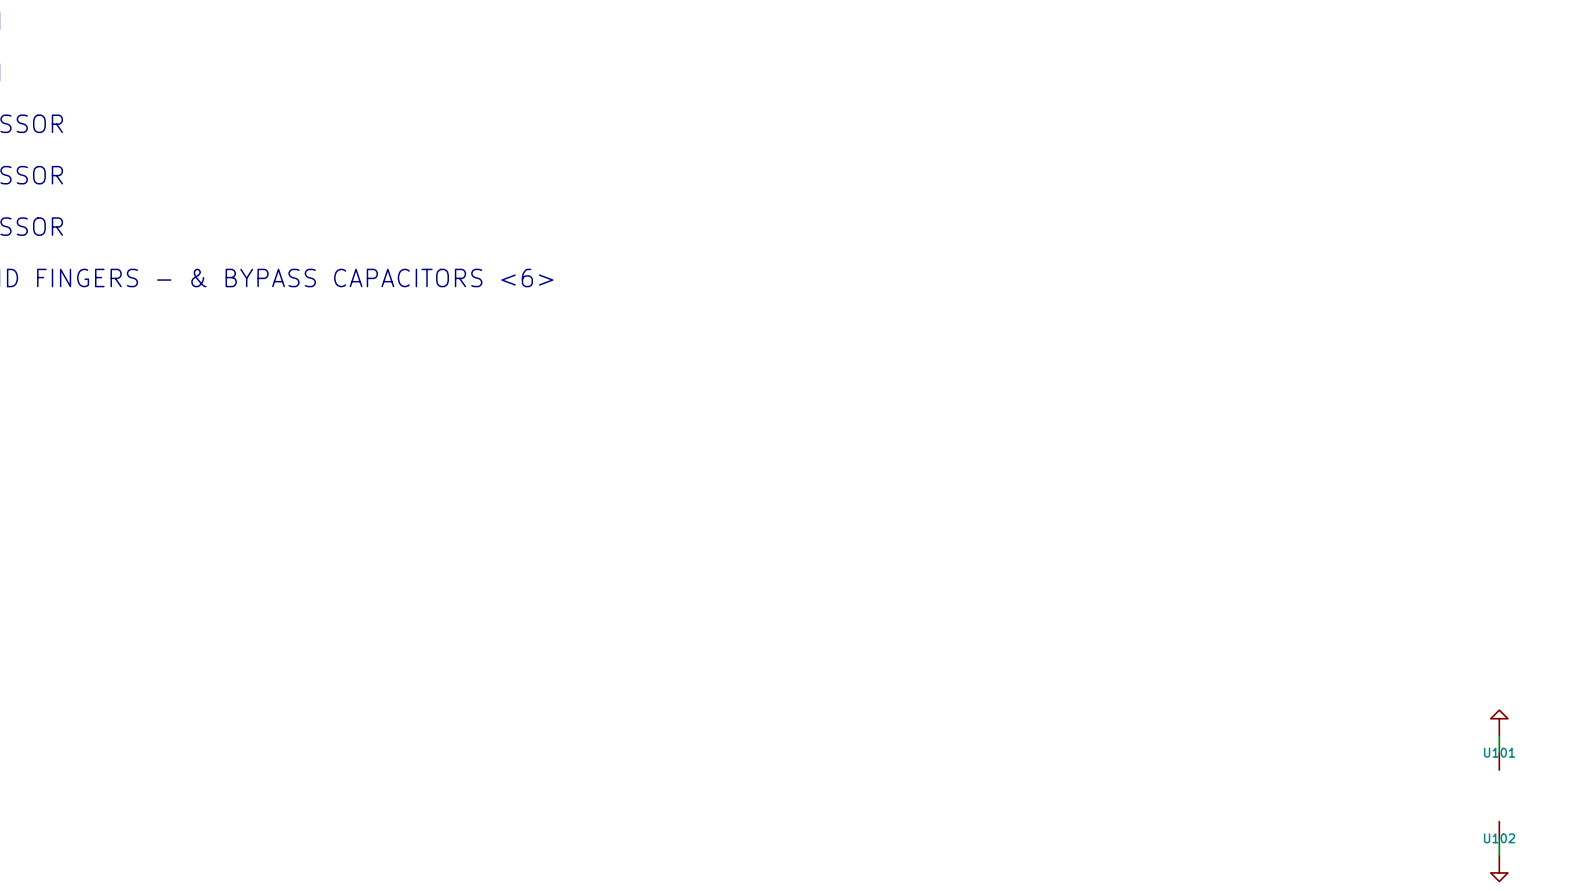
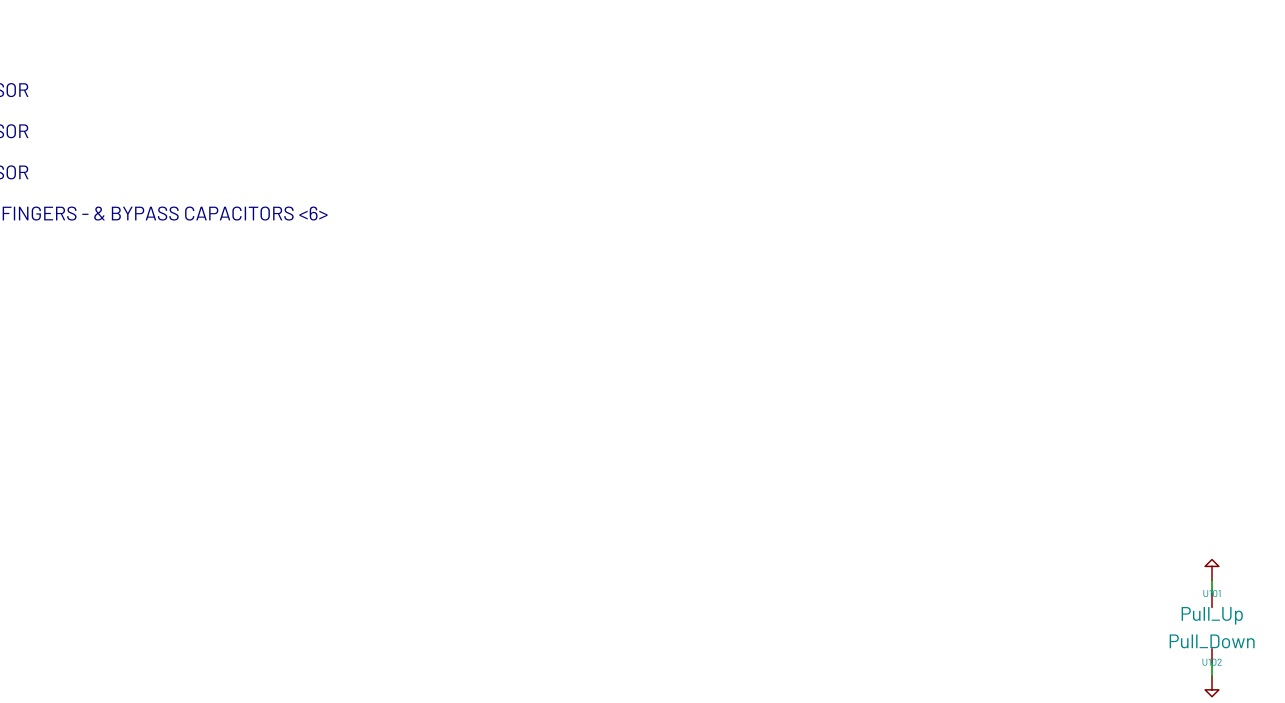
U101 value: none -> Pull_Up (1212, 615)
U102 value: none -> Pull_Down (1212, 641)

